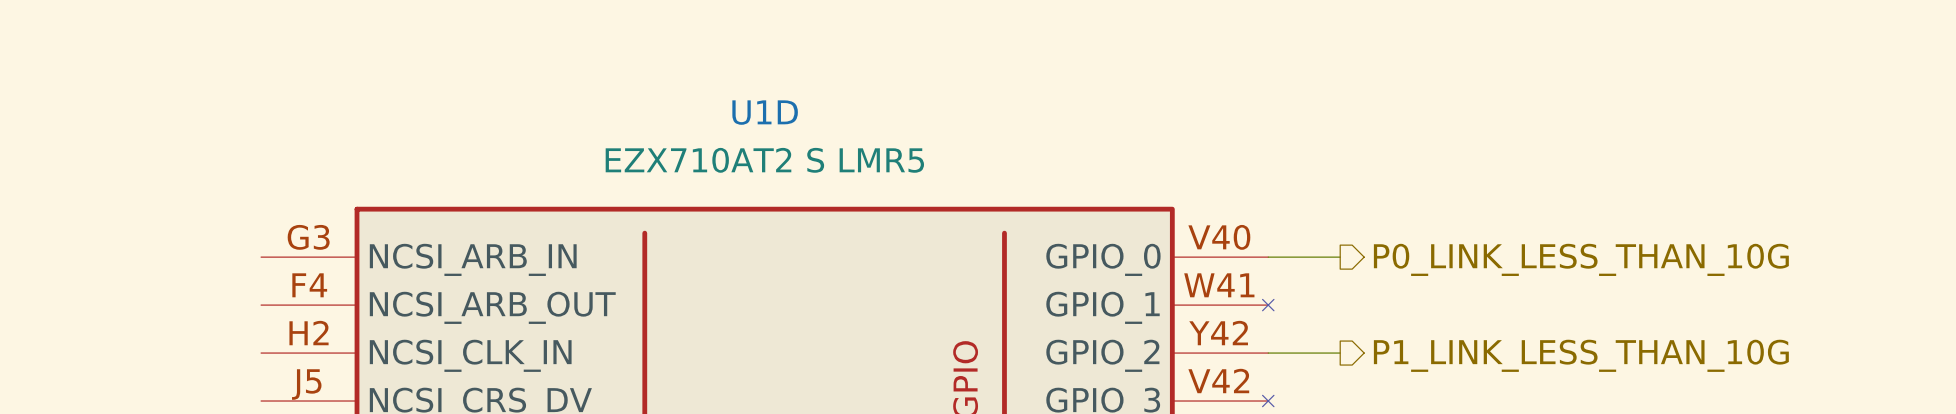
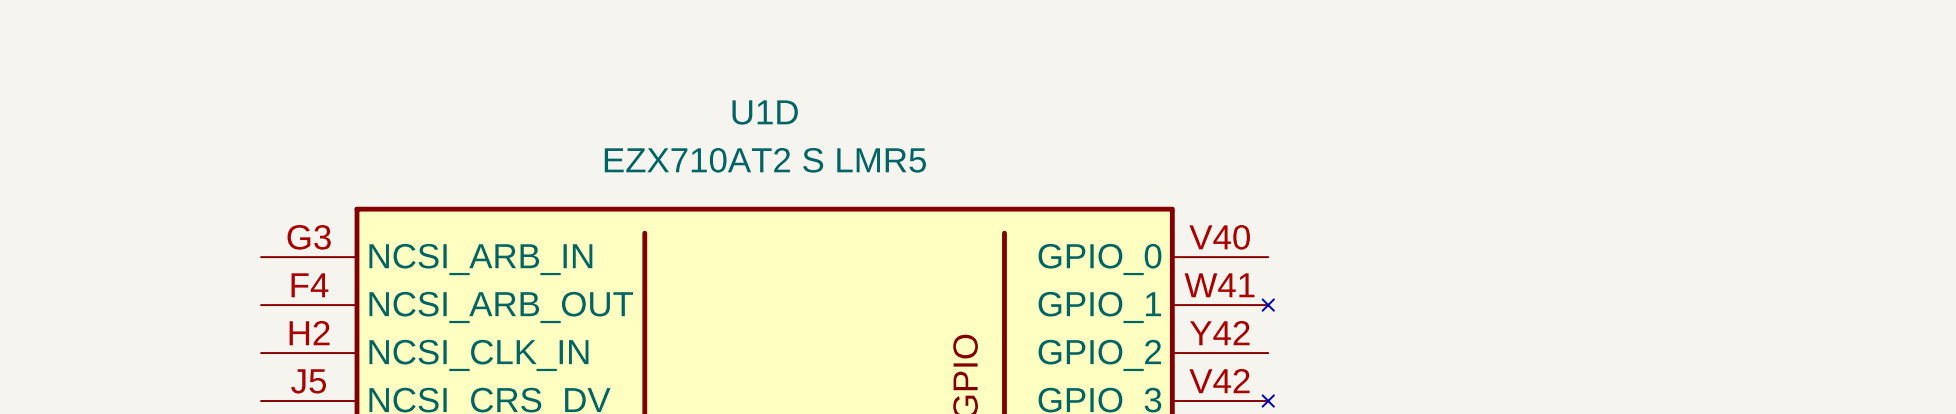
wire: (1268, 257) (1340, 257) -> none
hierarchical label: P0_LINK_LESS_THAN_10G (1581, 259) -> none
wire: (1268, 353) (1340, 353) -> none
hierarchical label: P1_LINK_LESS_THAN_10G (1581, 355) -> none

